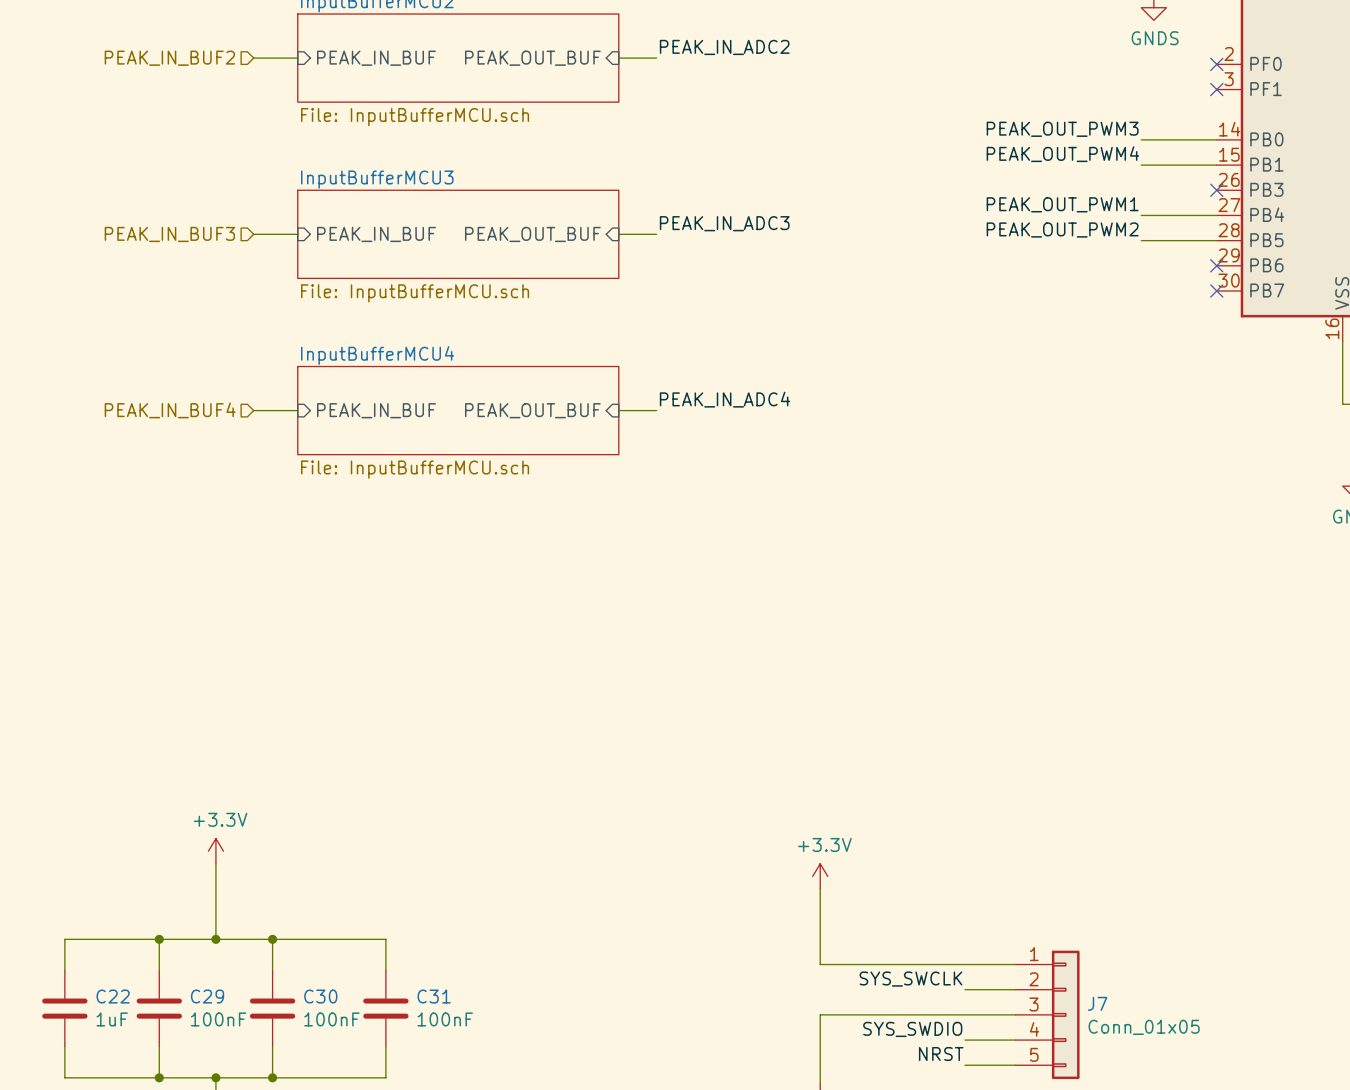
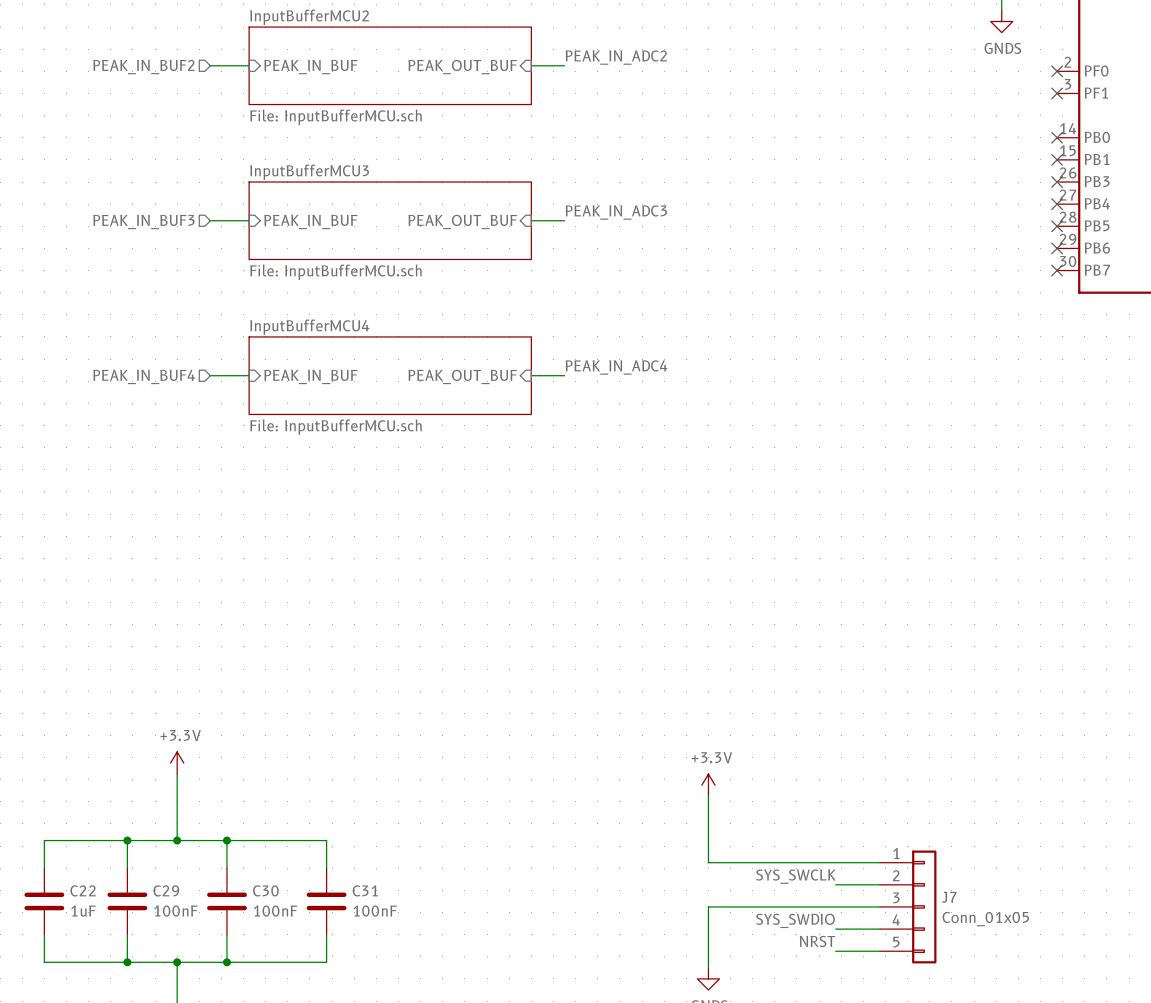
label: PEAK_OUT_PWM3 (1062, 129) -> none
wire: (1141, 139) (1216, 139) -> none
no-connect mark: none -> (1057, 137)
label: PEAK_OUT_PWM4 (1062, 154) -> none
wire: (1141, 165) (1216, 165) -> none
no-connect mark: none -> (1057, 159)
label: PEAK_OUT_PWM1 (1062, 204) -> none
wire: (1141, 215) (1216, 215) -> none
no-connect mark: none -> (1057, 204)
label: PEAK_OUT_PWM2 (1062, 229) -> none
wire: (1141, 240) (1216, 240) -> none
no-connect mark: none -> (1057, 226)

